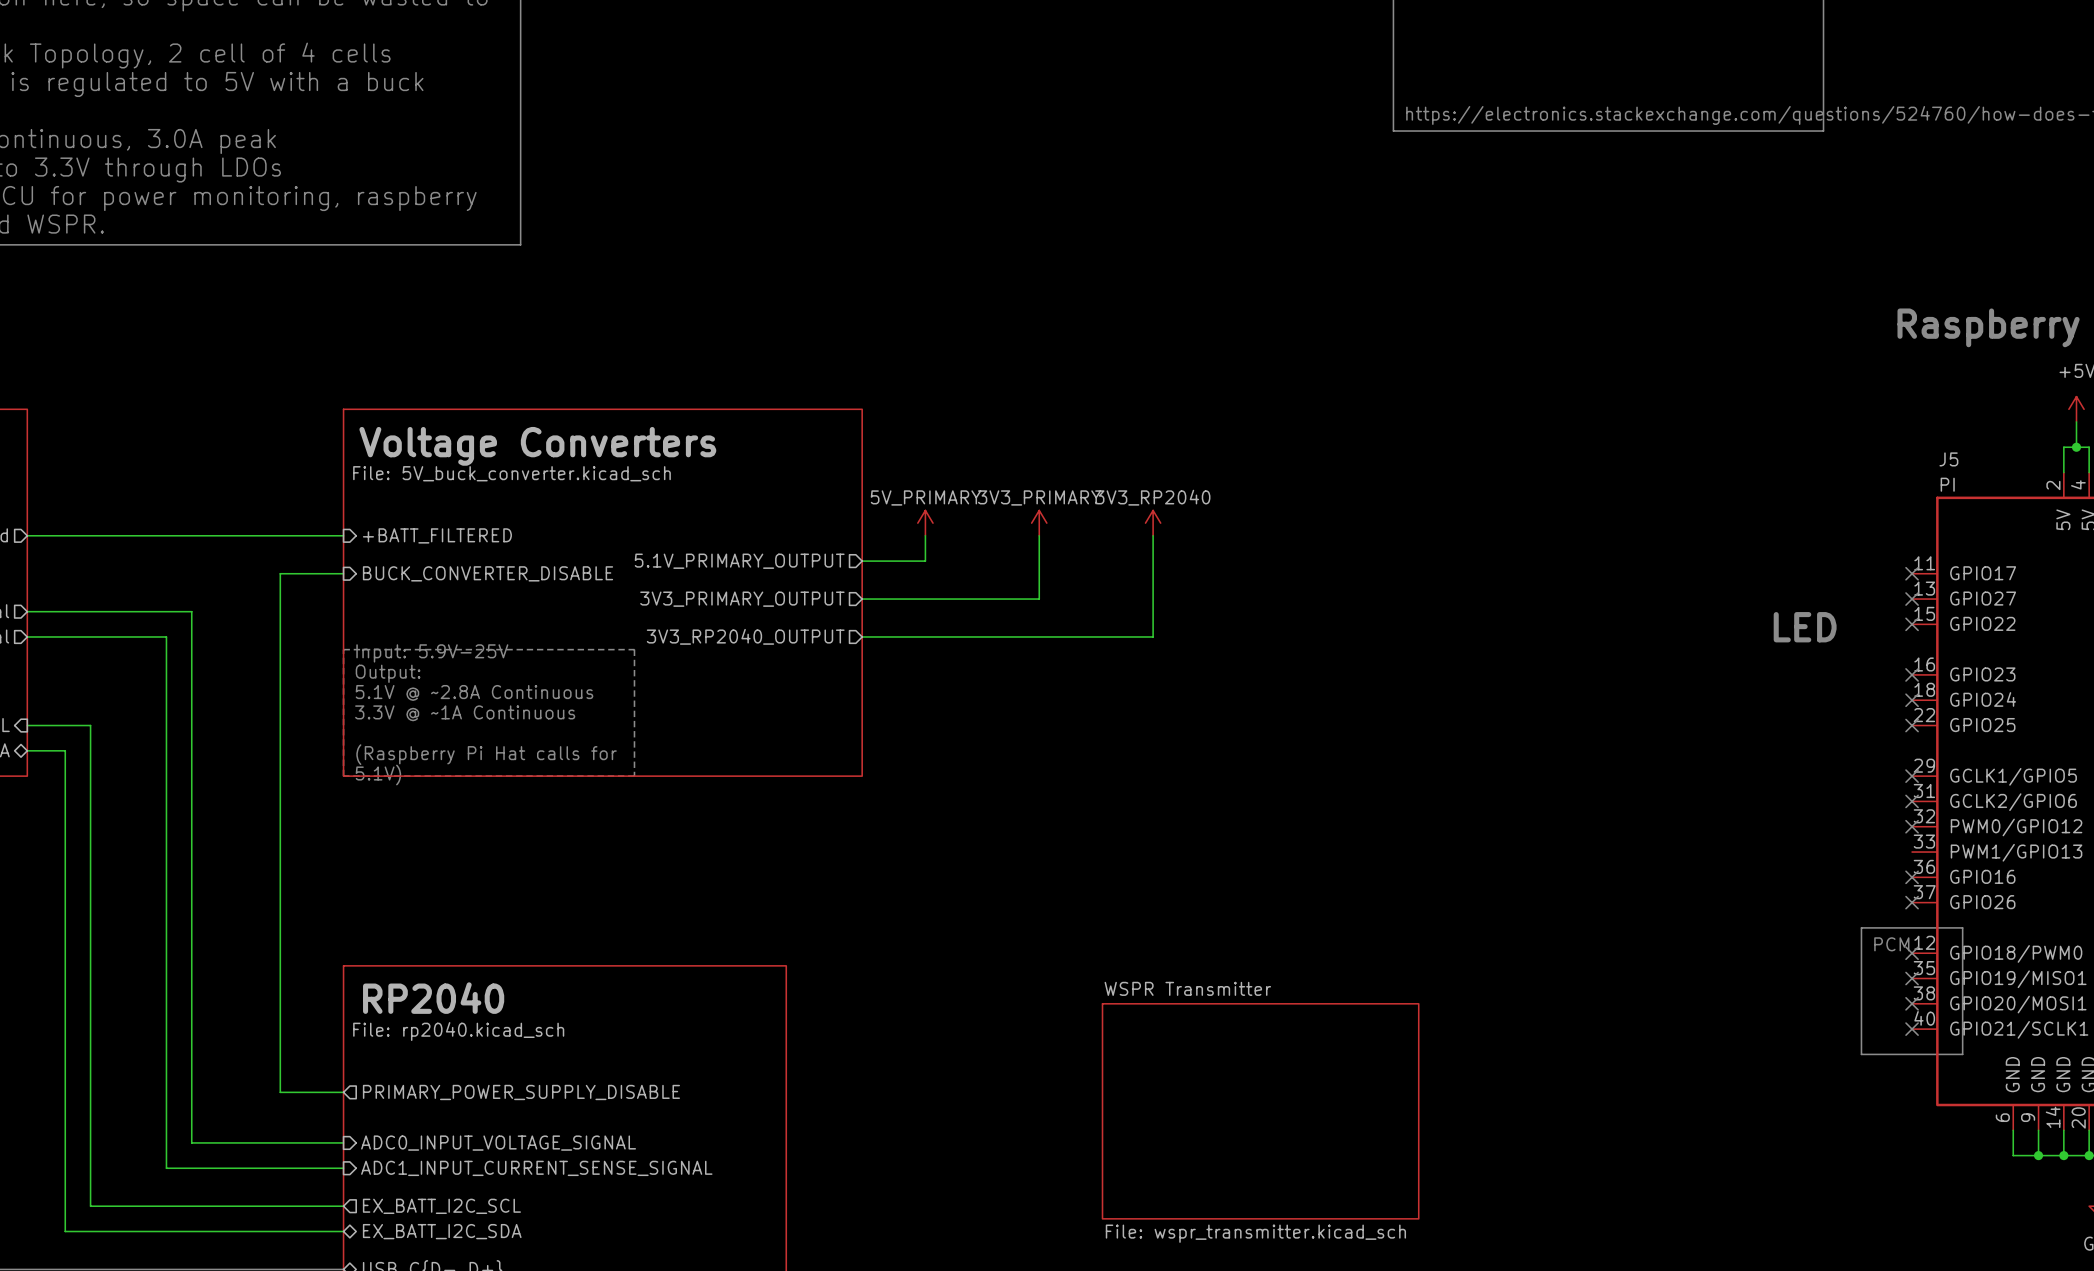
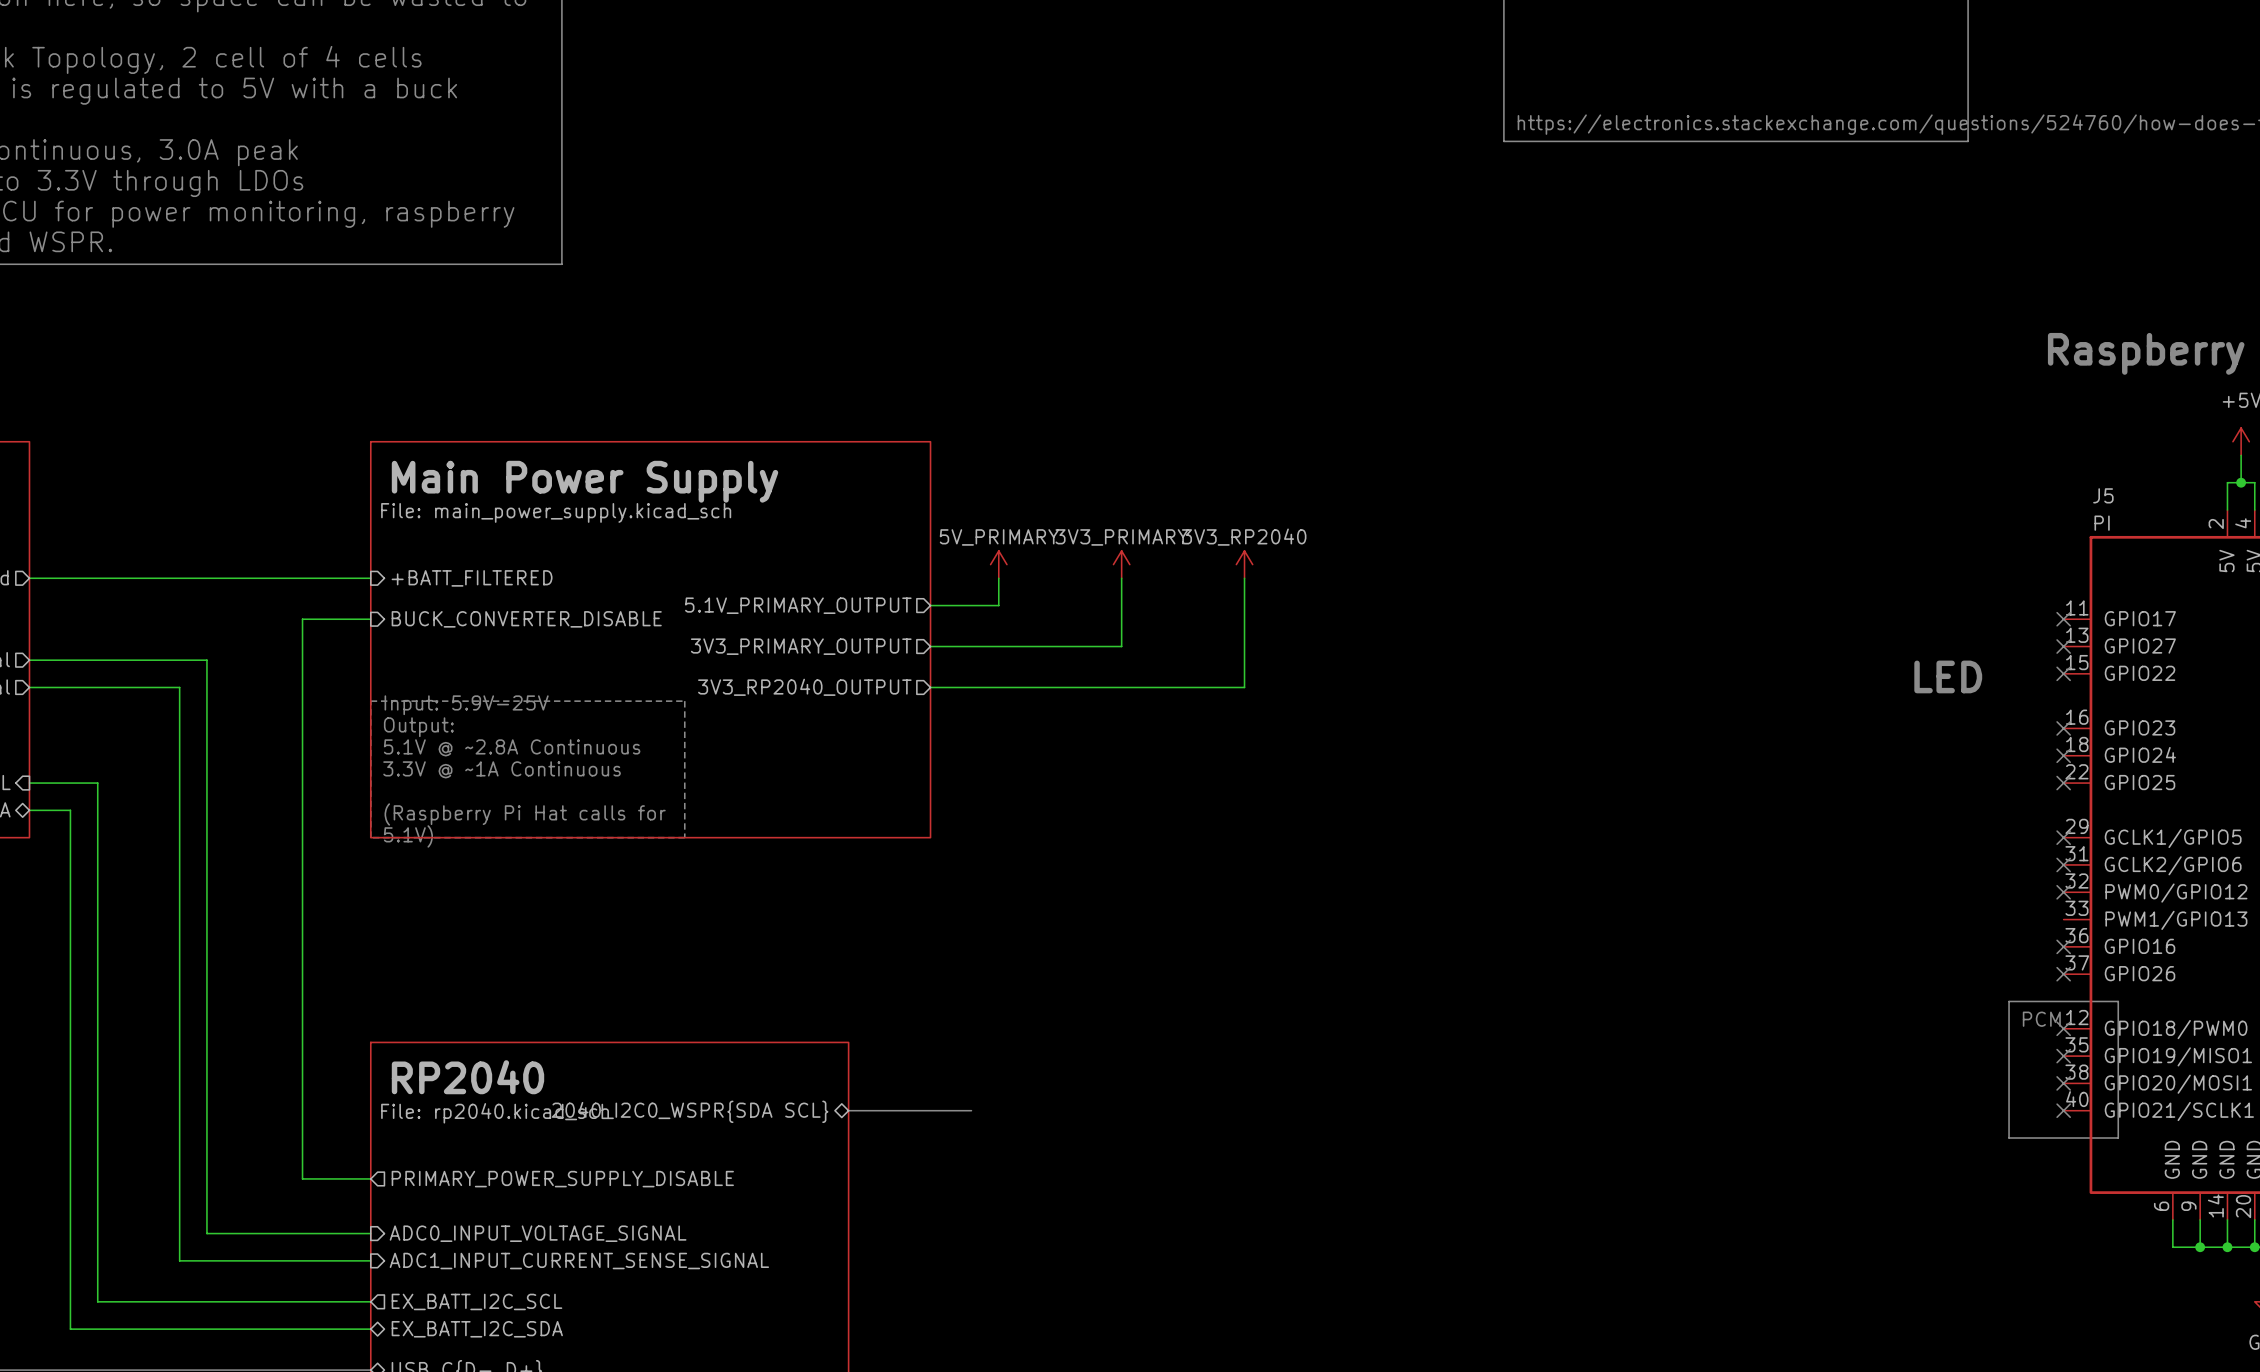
sheet Voltage Converters name: Voltage Converters (537, 446) -> Main Power Supply (585, 481)
sheet Voltage Converters value: File: 5V_buck_converter.kicad_sch (512, 473) -> File: main_power_supply.kicad_sch (556, 512)
bus: none -> (848, 1110) (971, 1110)
sheet pin: none -> 2040_I2C0_WSPR{SDA SCL} (690, 1111)
sheet WSPR Transmitter: File: wspr_transmitter.kicad_sch (1260, 1111) -> none

